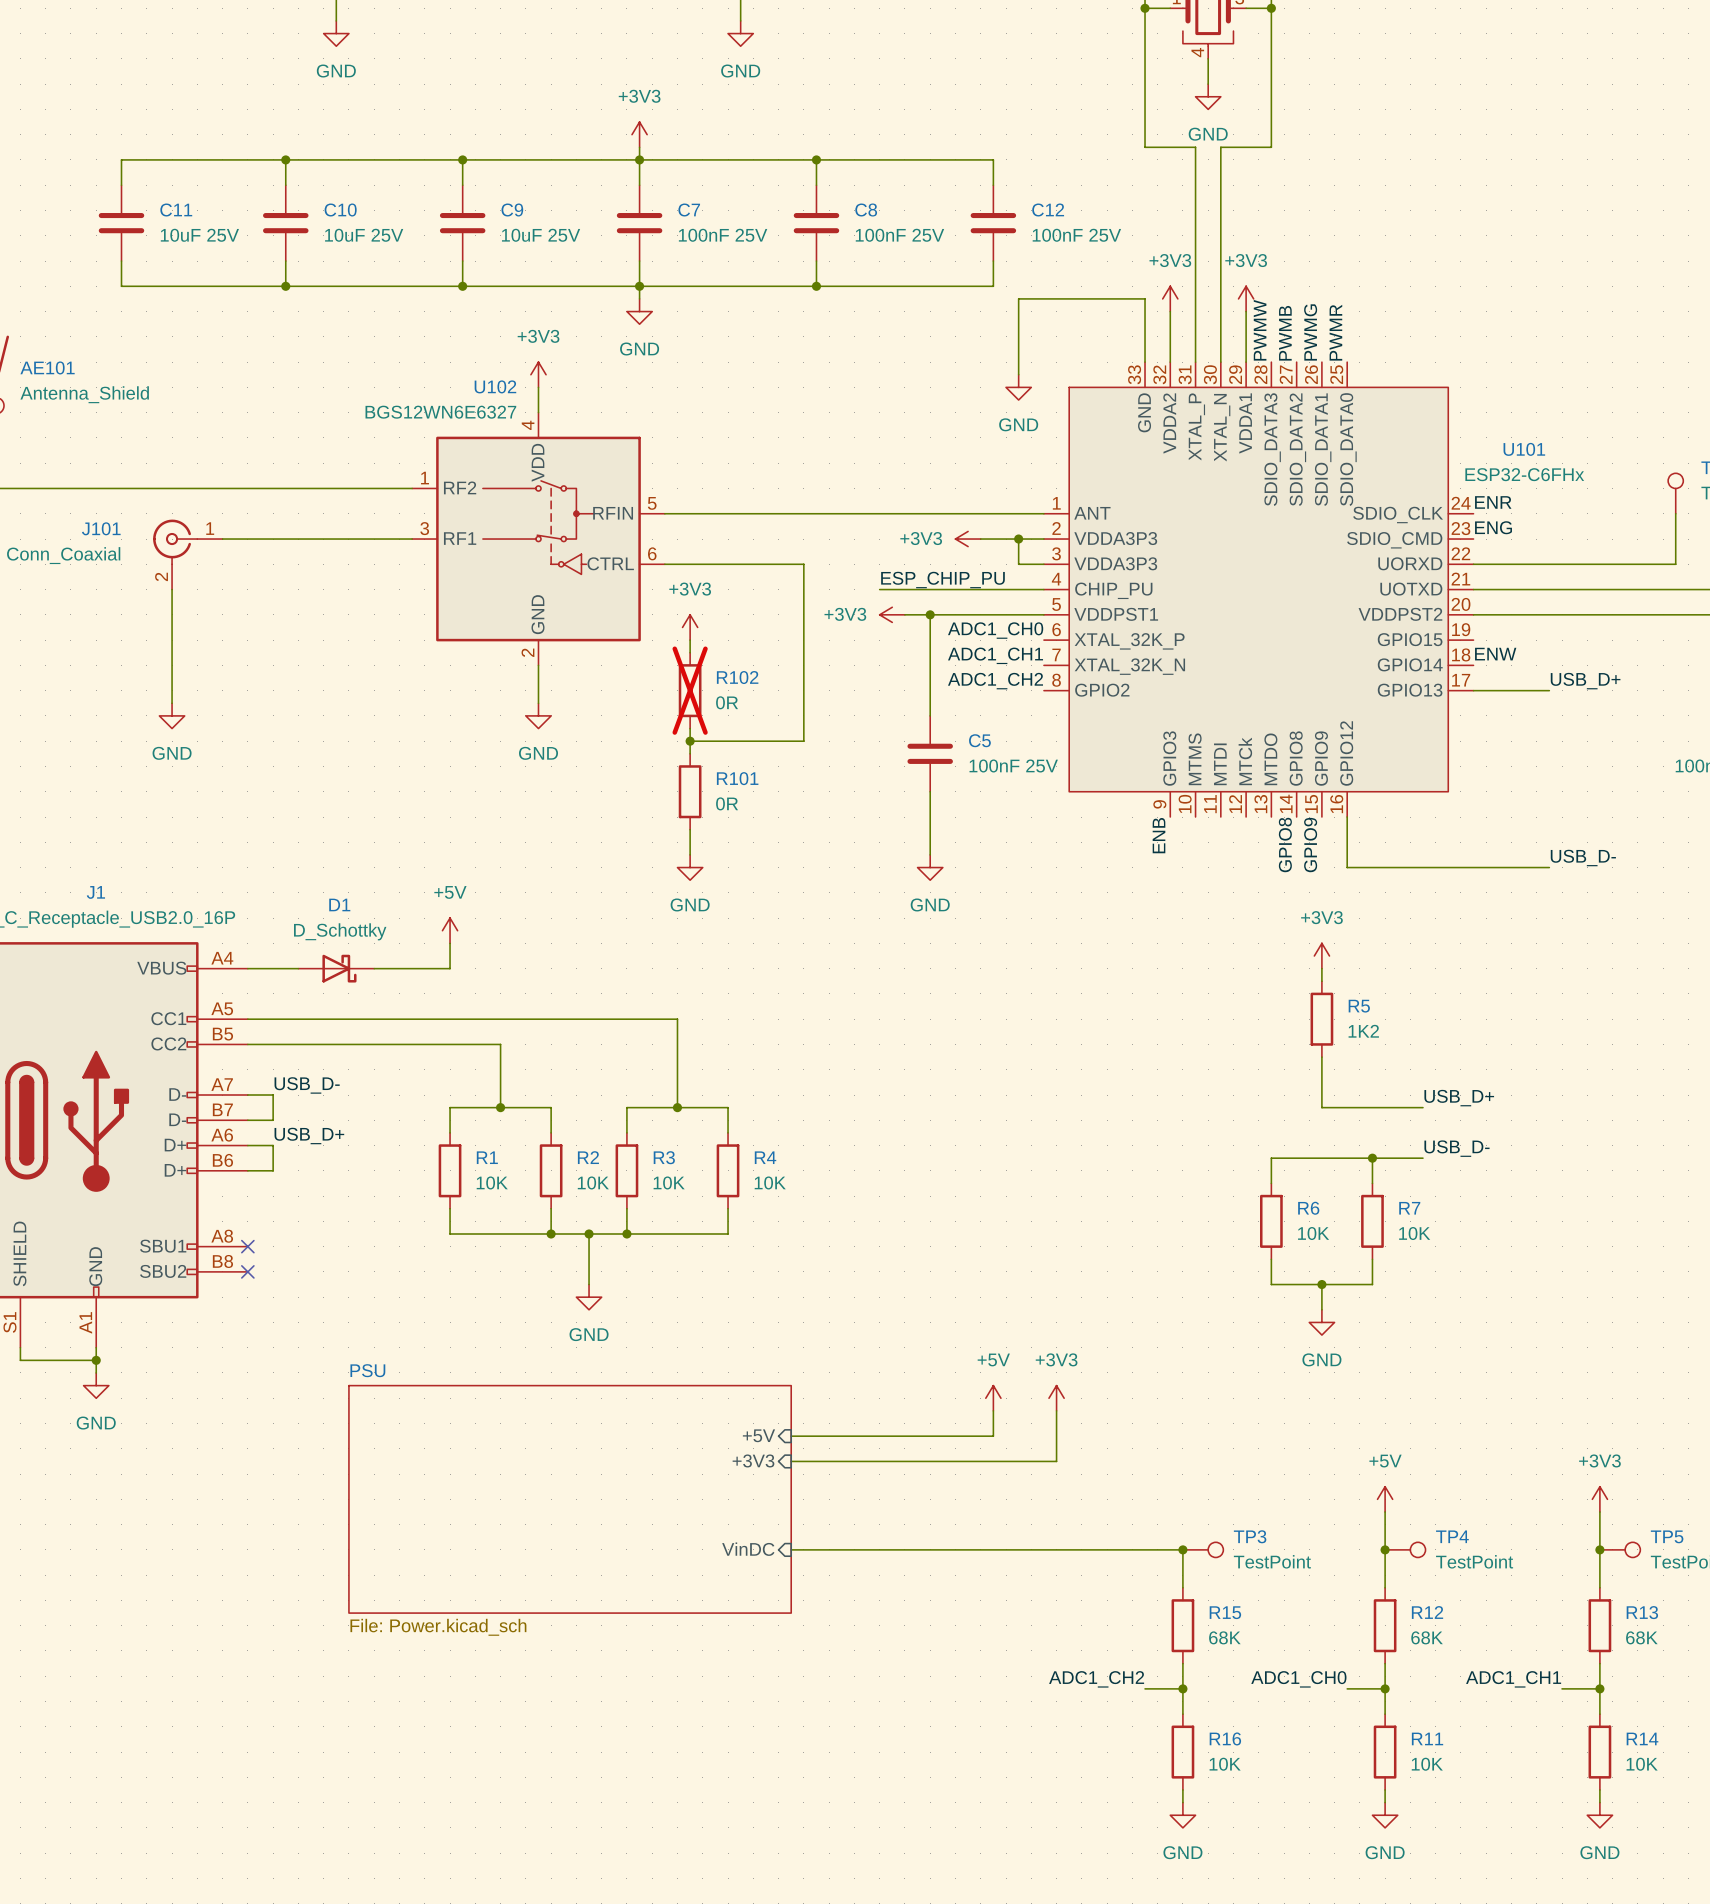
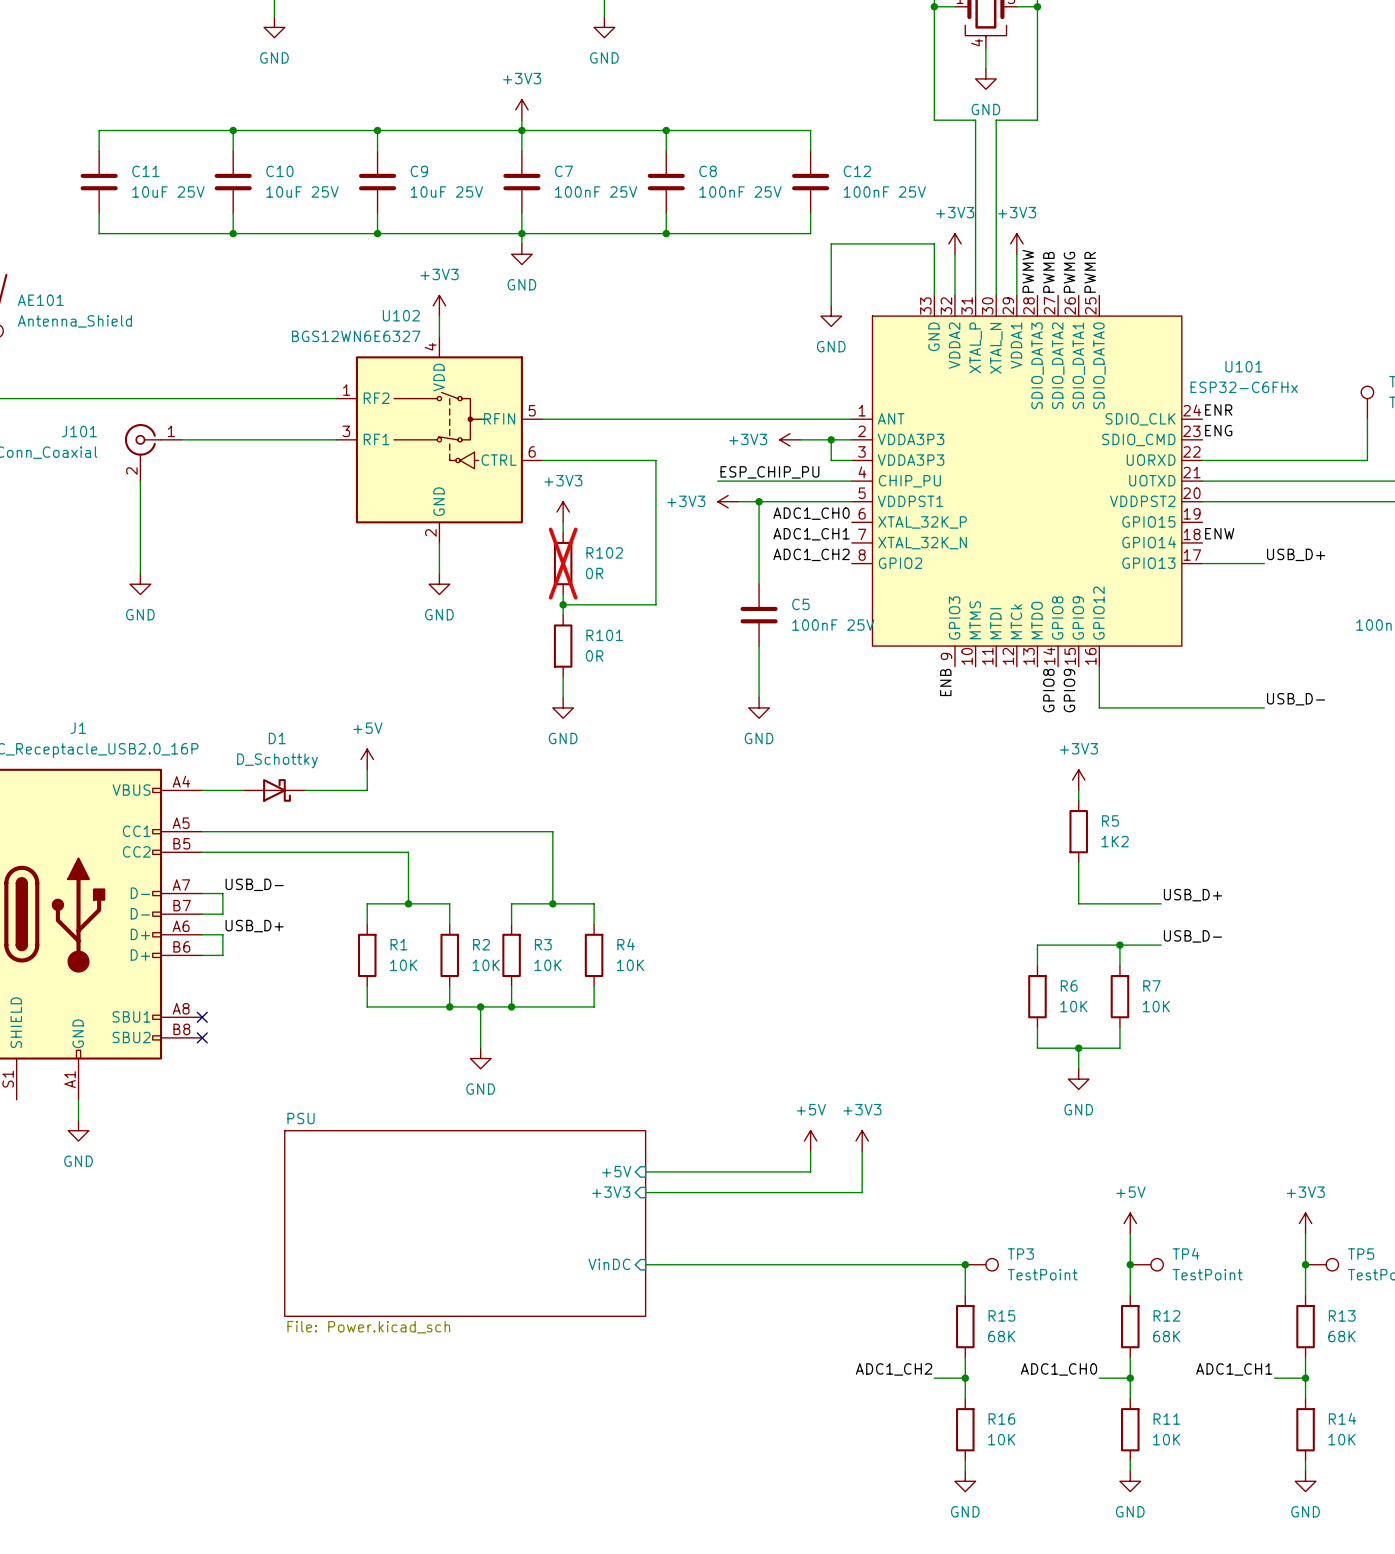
wire: (20, 1347) (20, 1360) (96, 1360) -> none
junction: (96, 1360) -> none

